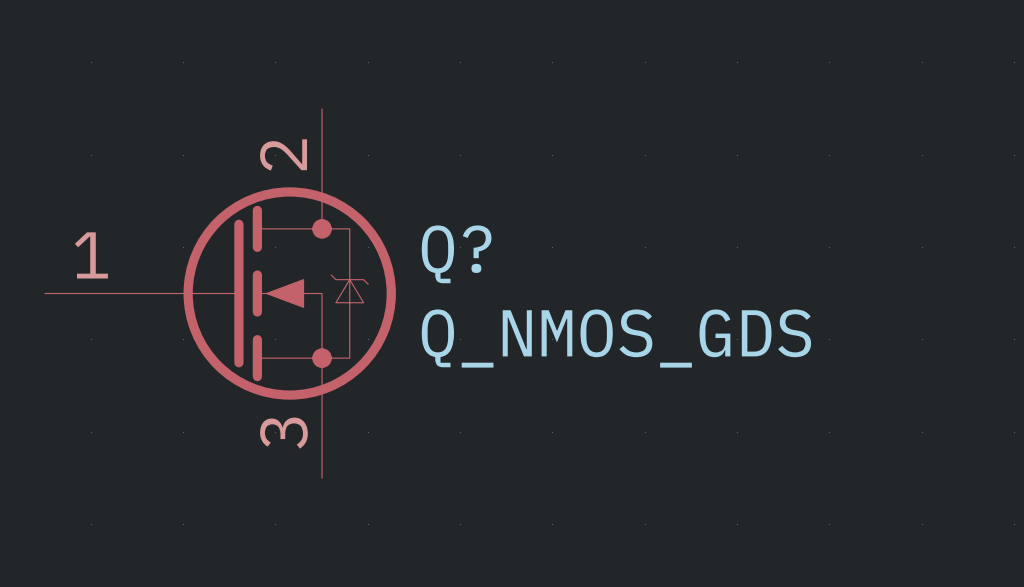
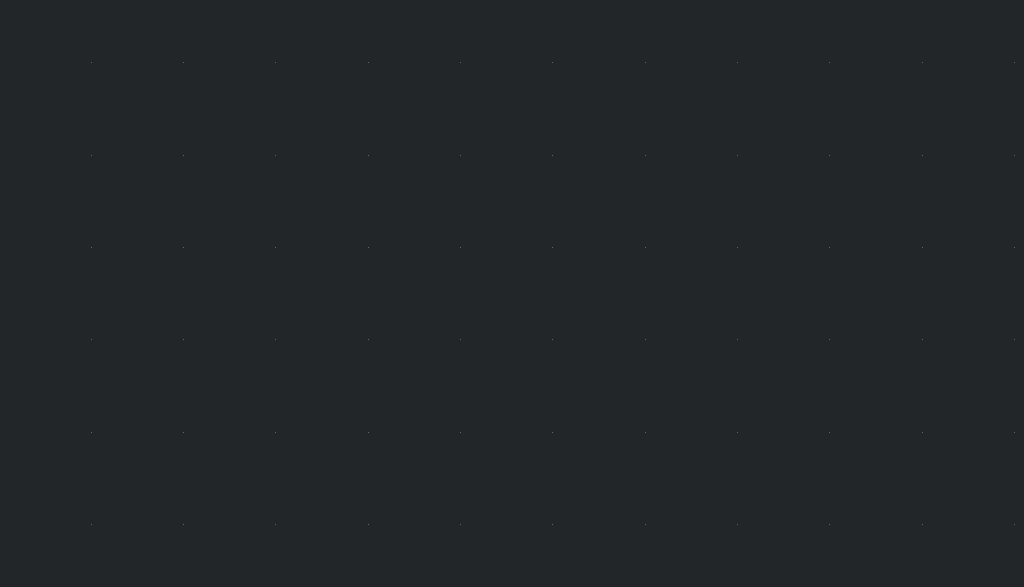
Q?: Q_NMOS_GDS (220, 293) -> none

